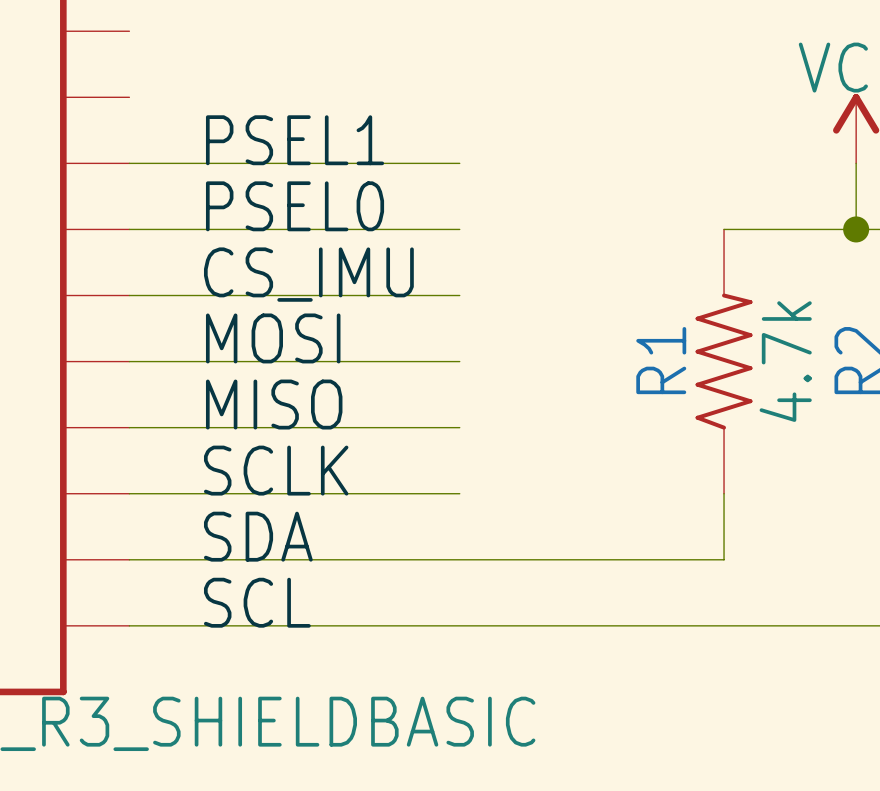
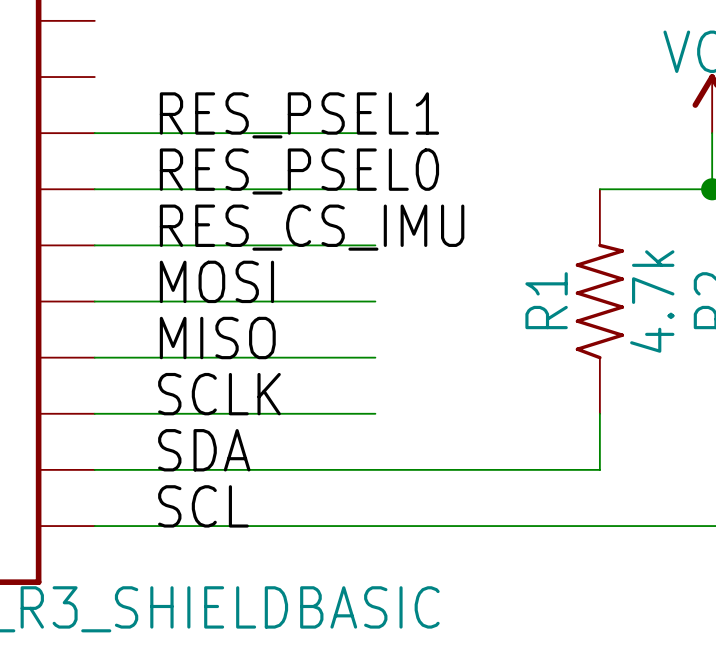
label: PSEL1 (295, 140) -> RES_PSEL1 (299, 115)
label: PSEL0 (295, 206) -> RES_PSEL0 (299, 171)
label: CS_IMU (308, 274) -> RES_CS_IMU (312, 227)

